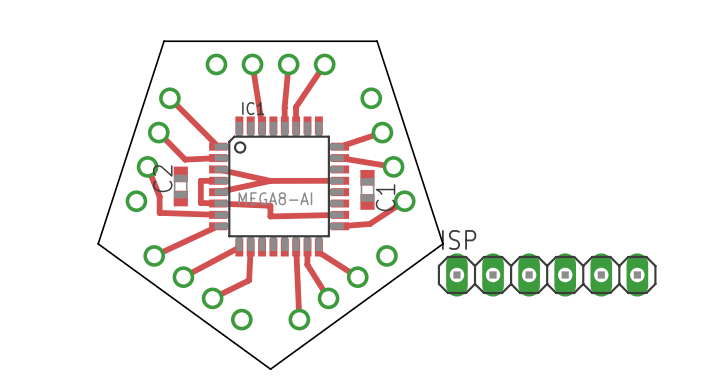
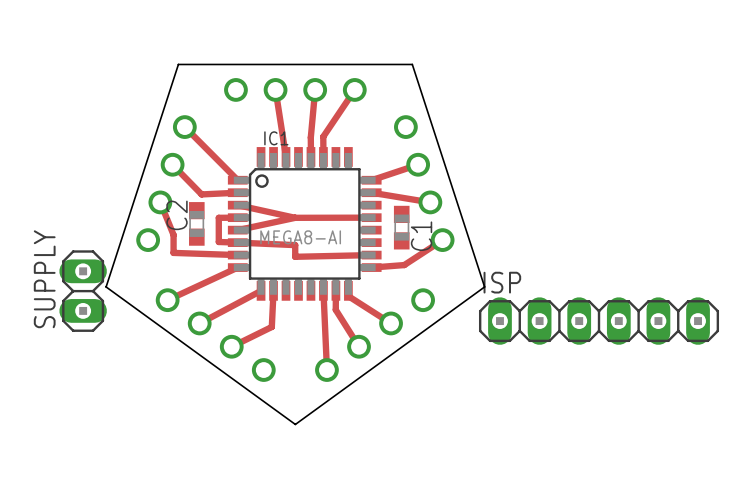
SUPPLY: none -> (83, 291)

